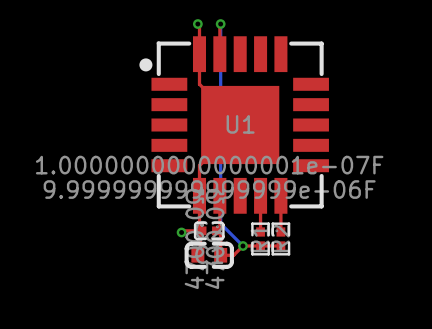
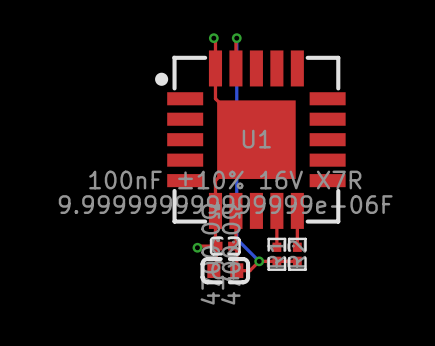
part value: 1.0000000000000001e-07F (209, 165) -> 100nF ±10% 16V X7R (225, 180)

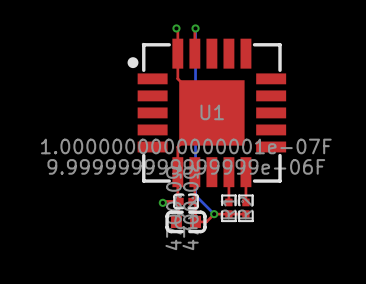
part value: 100nF ±10% 16V X7R (225, 180) -> 1.0000000000000001e-07F (186, 146)

